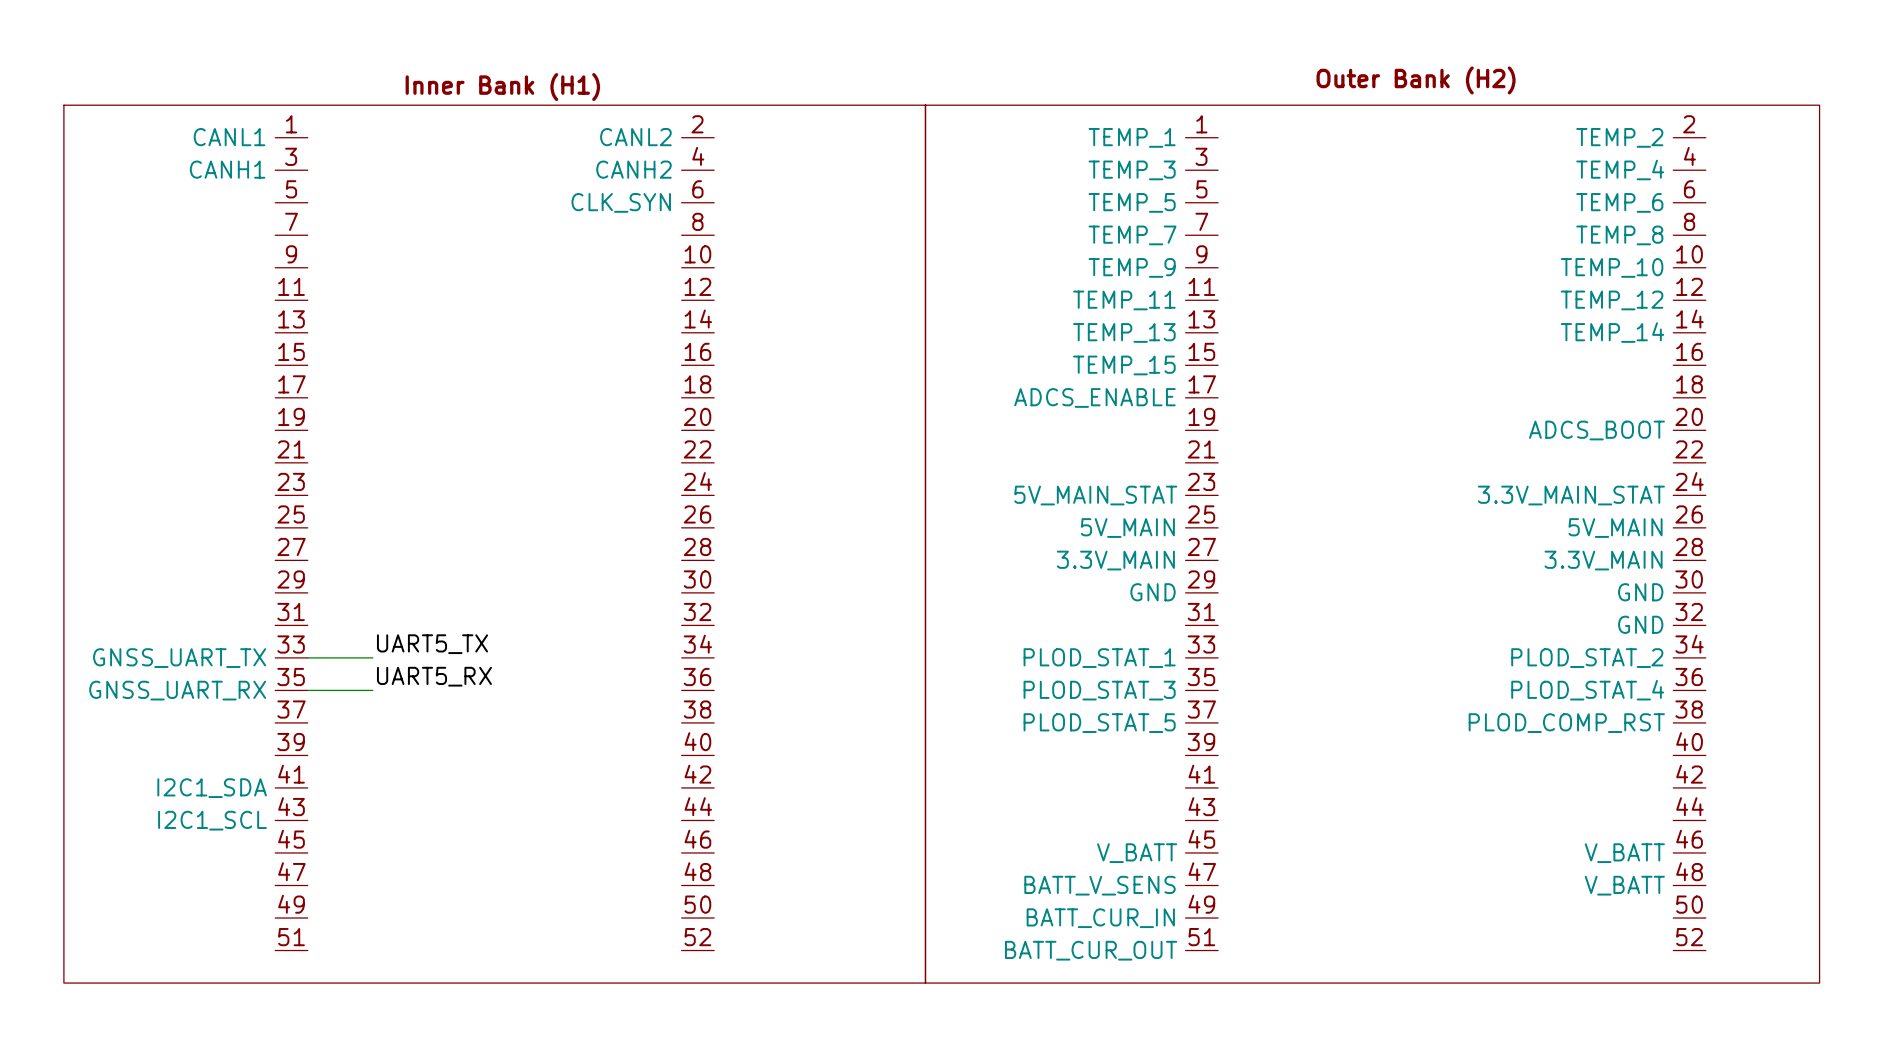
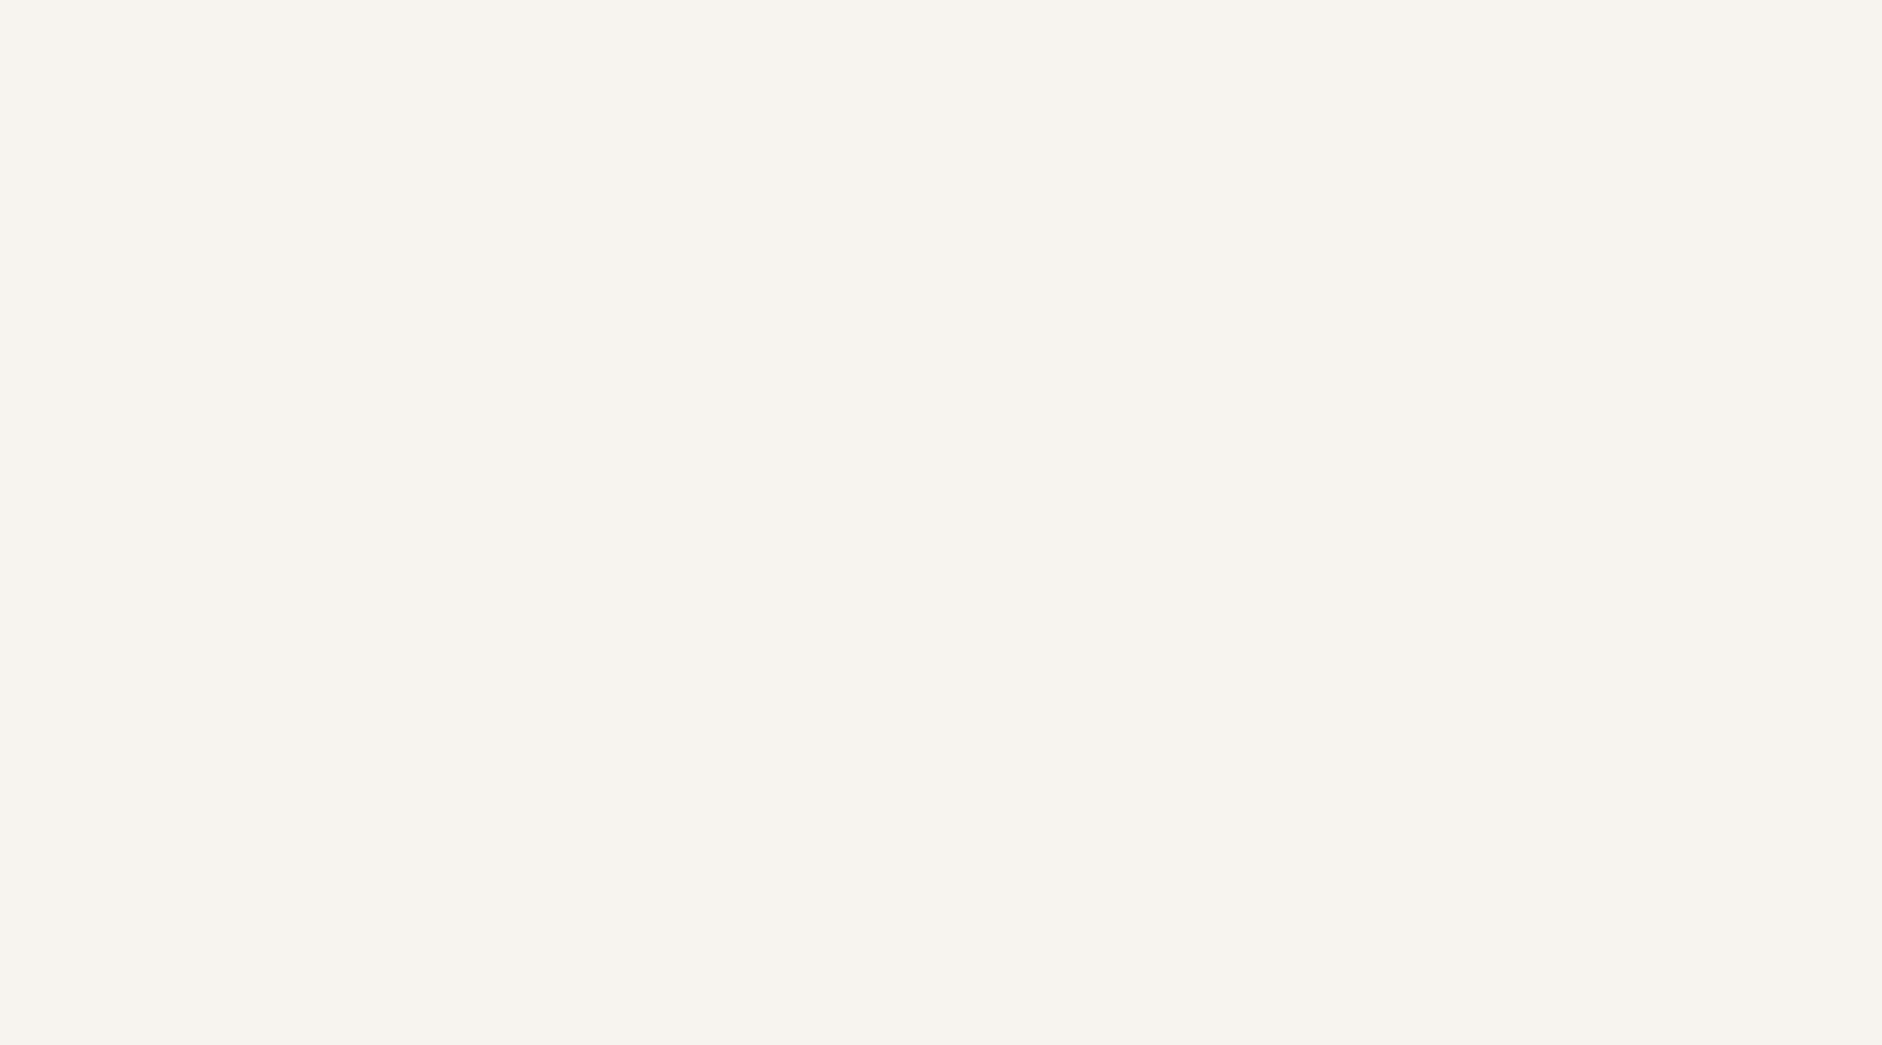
part: (941, 544) -> none
label: UART5_TX (432, 644) -> none
wire: (307, 657) (372, 657) -> none
label: UART5_RX (434, 676) -> none
wire: (307, 690) (372, 690) -> none

